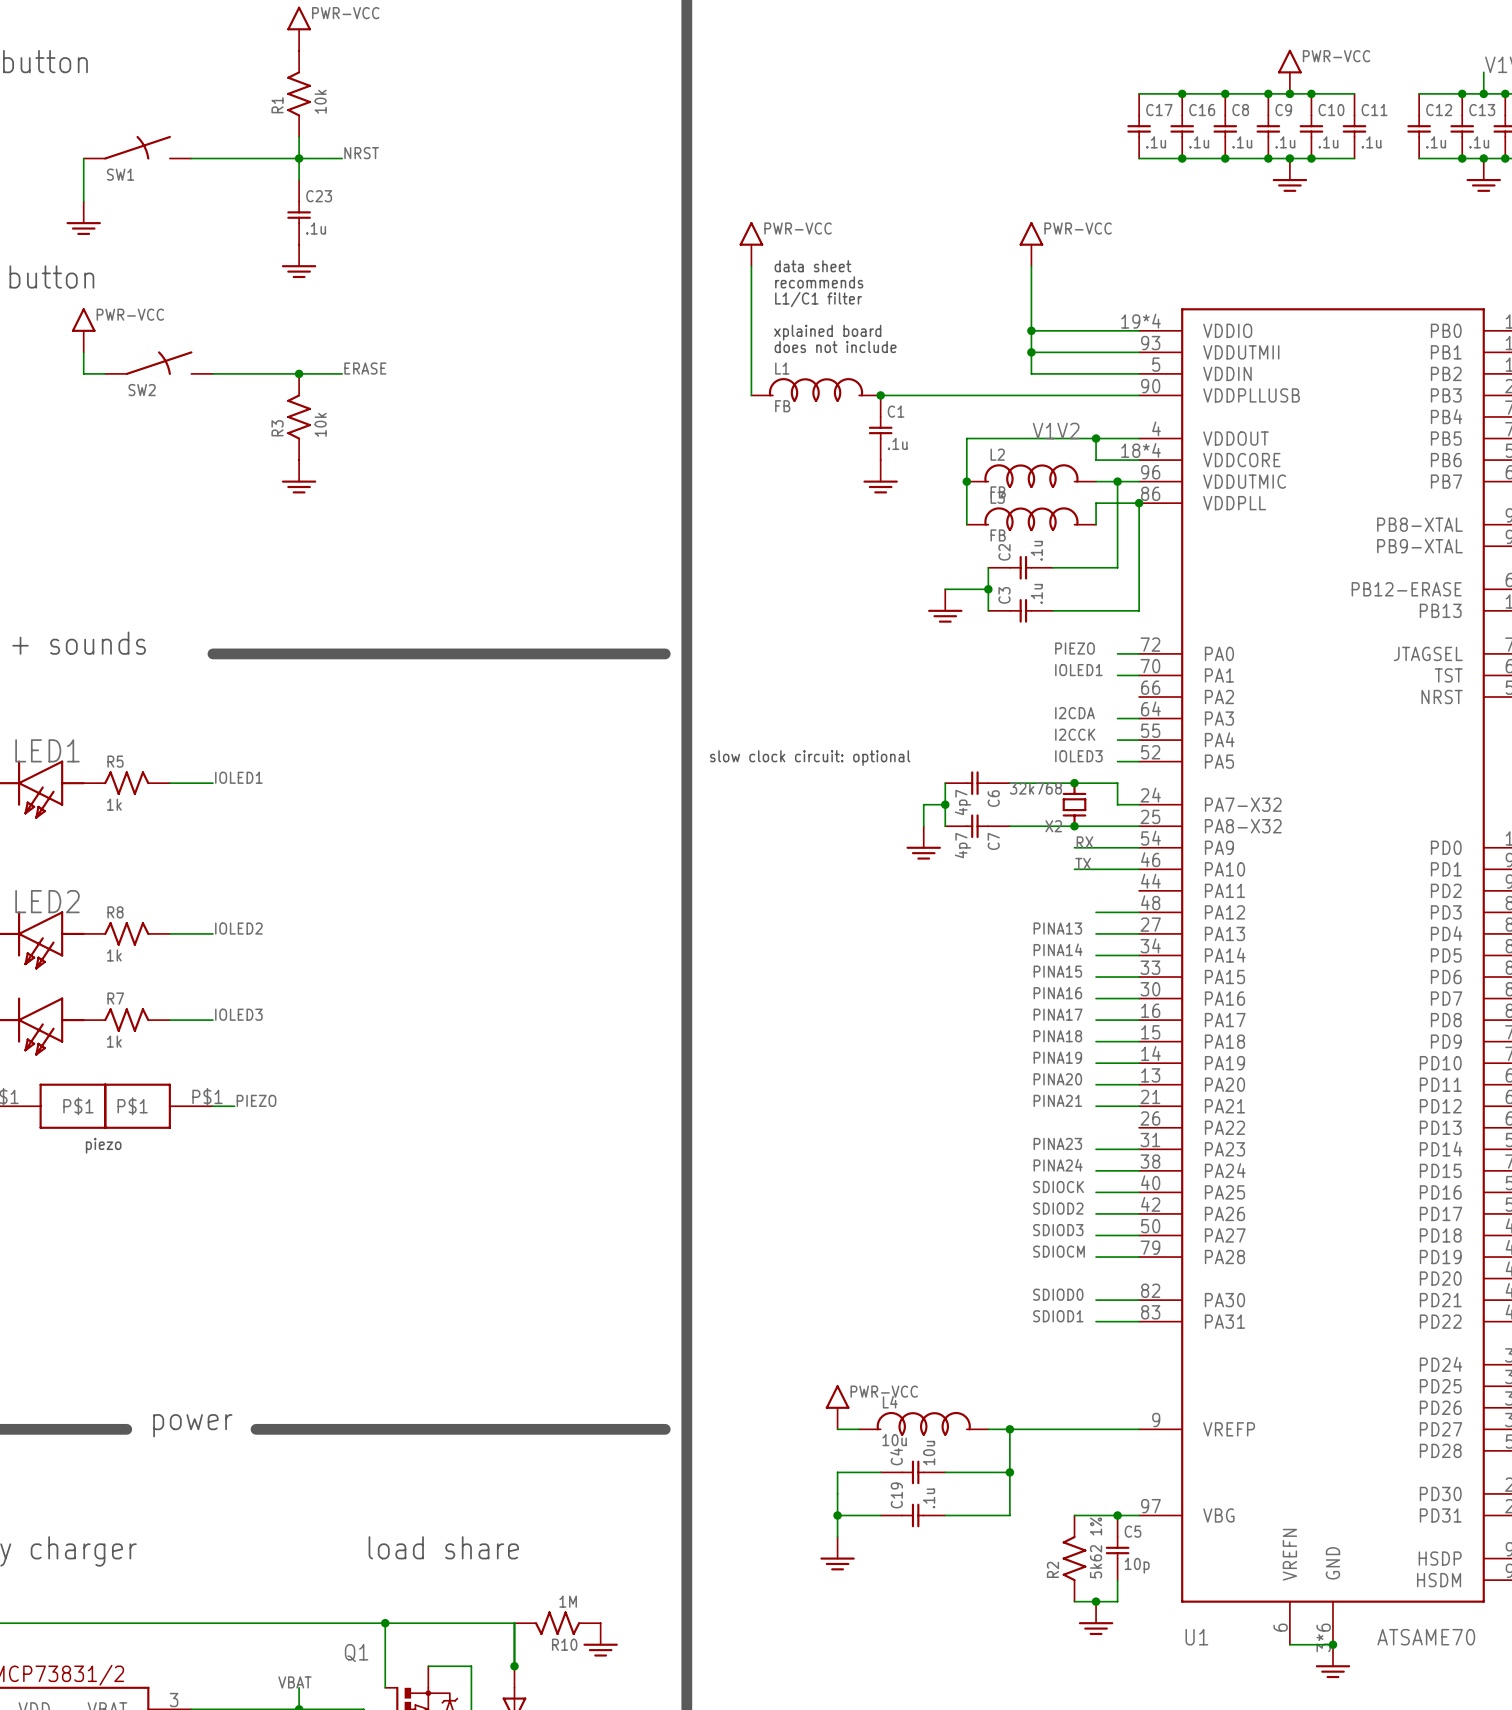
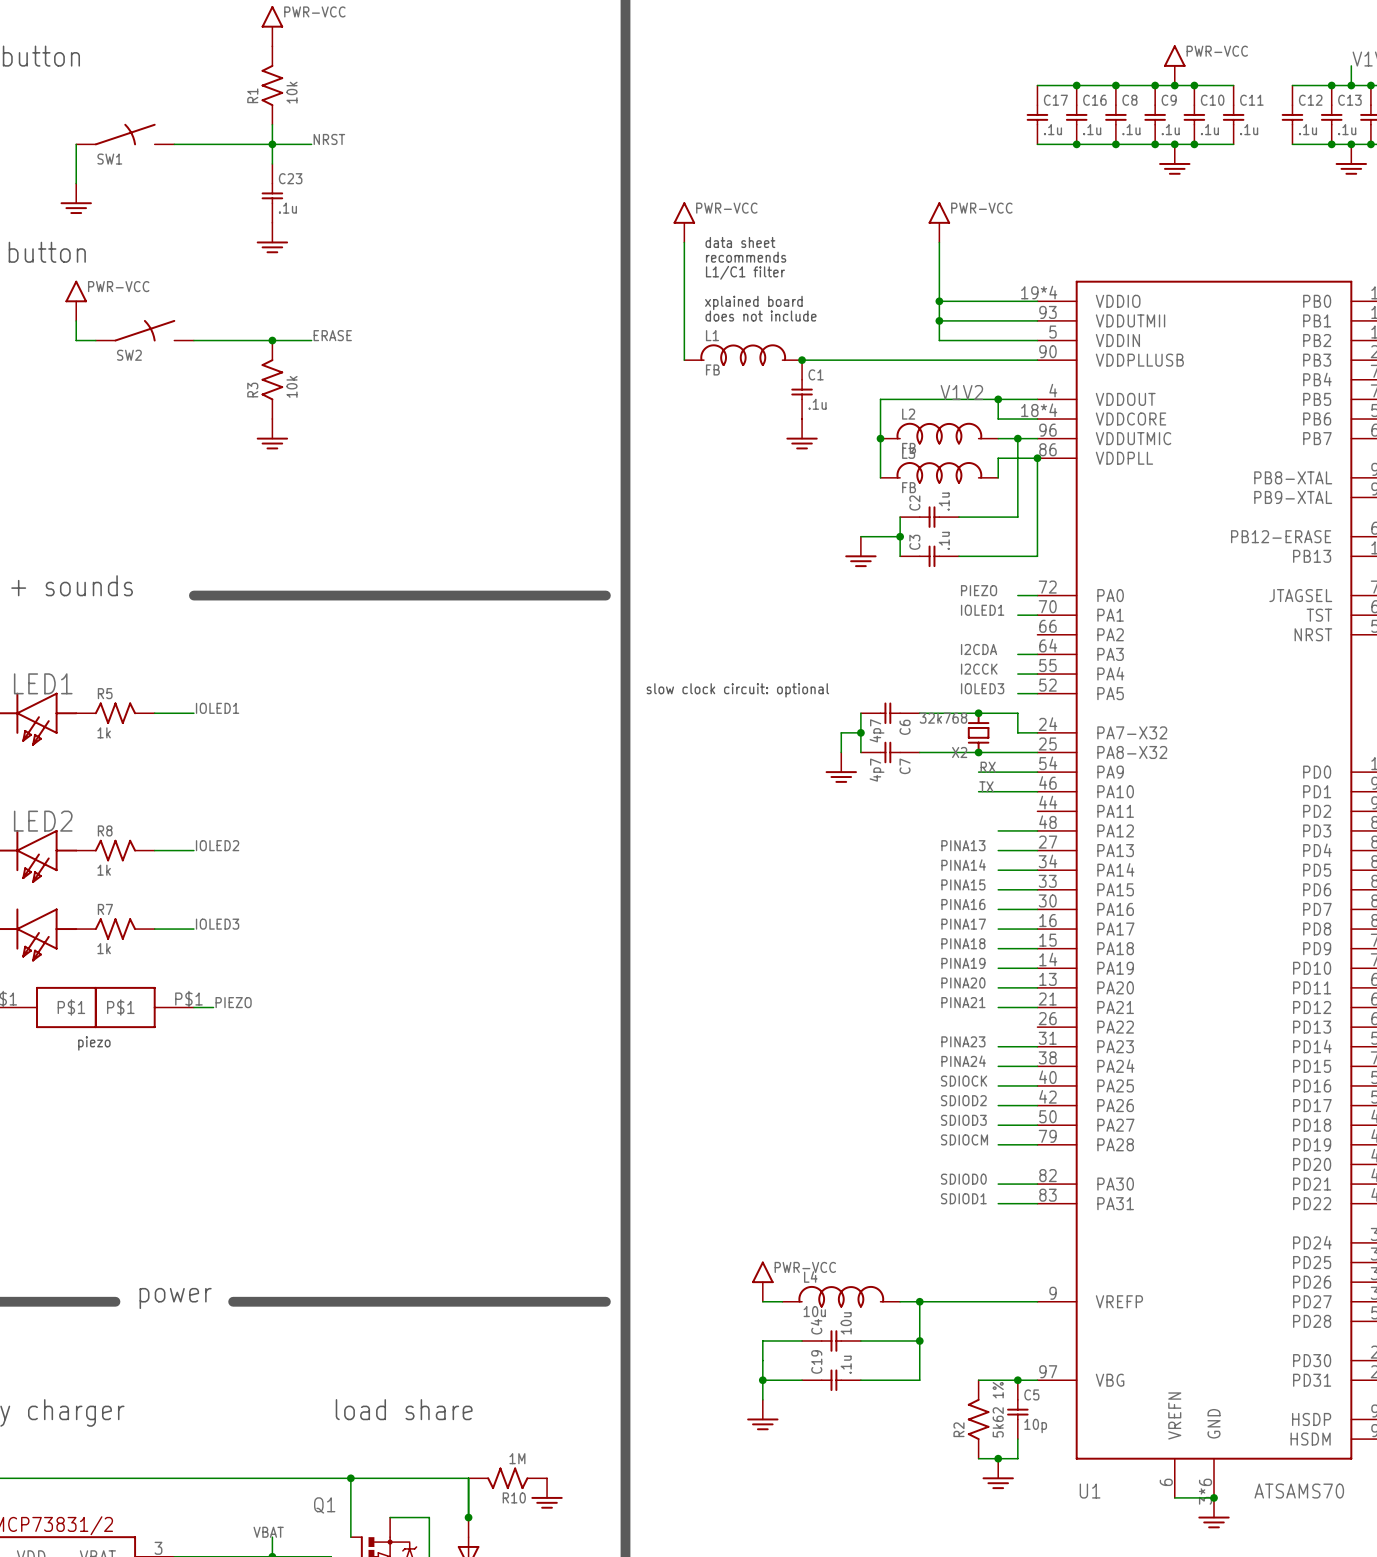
U1 value: ATSAME70 (1426, 1637) -> ATSAMS70 (1299, 1491)

